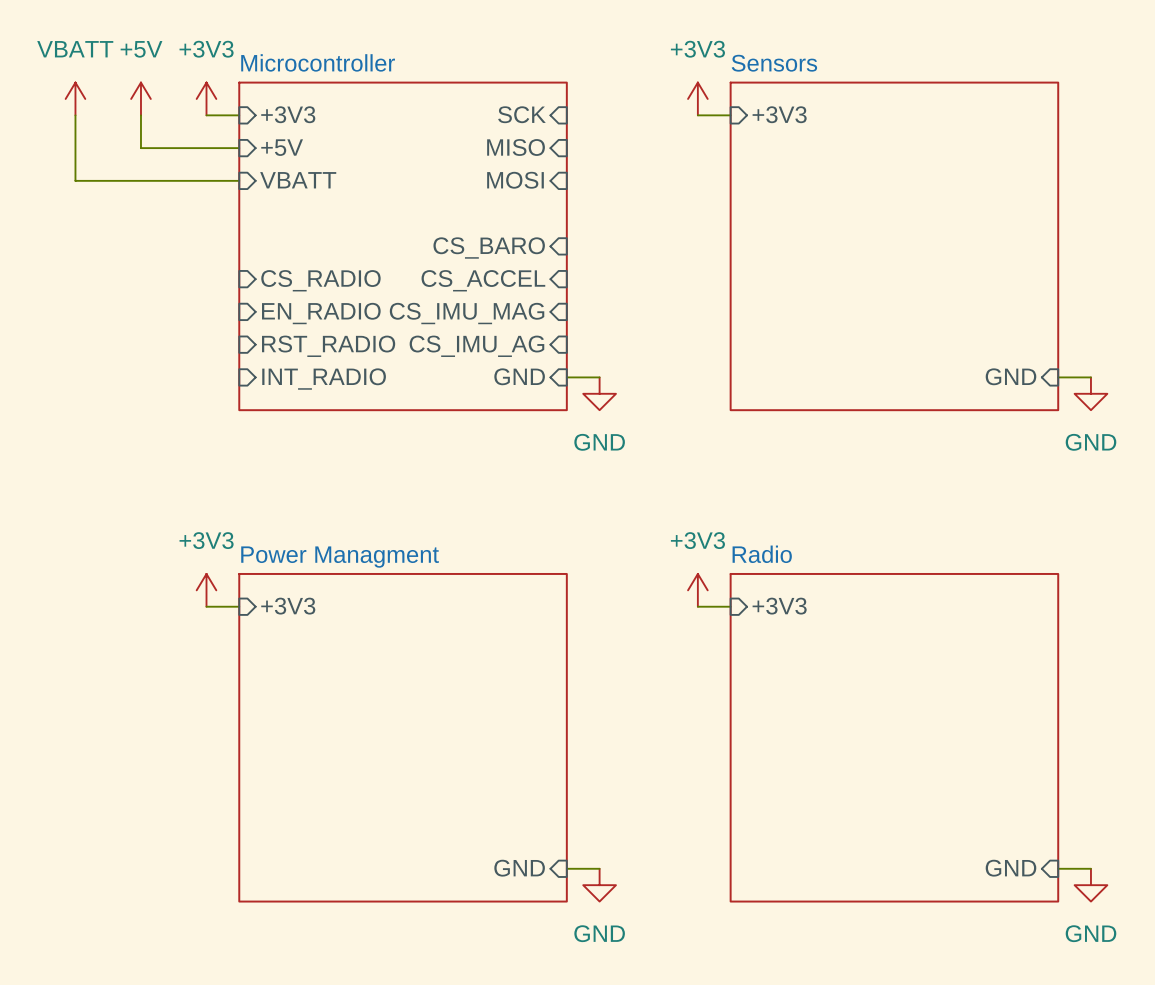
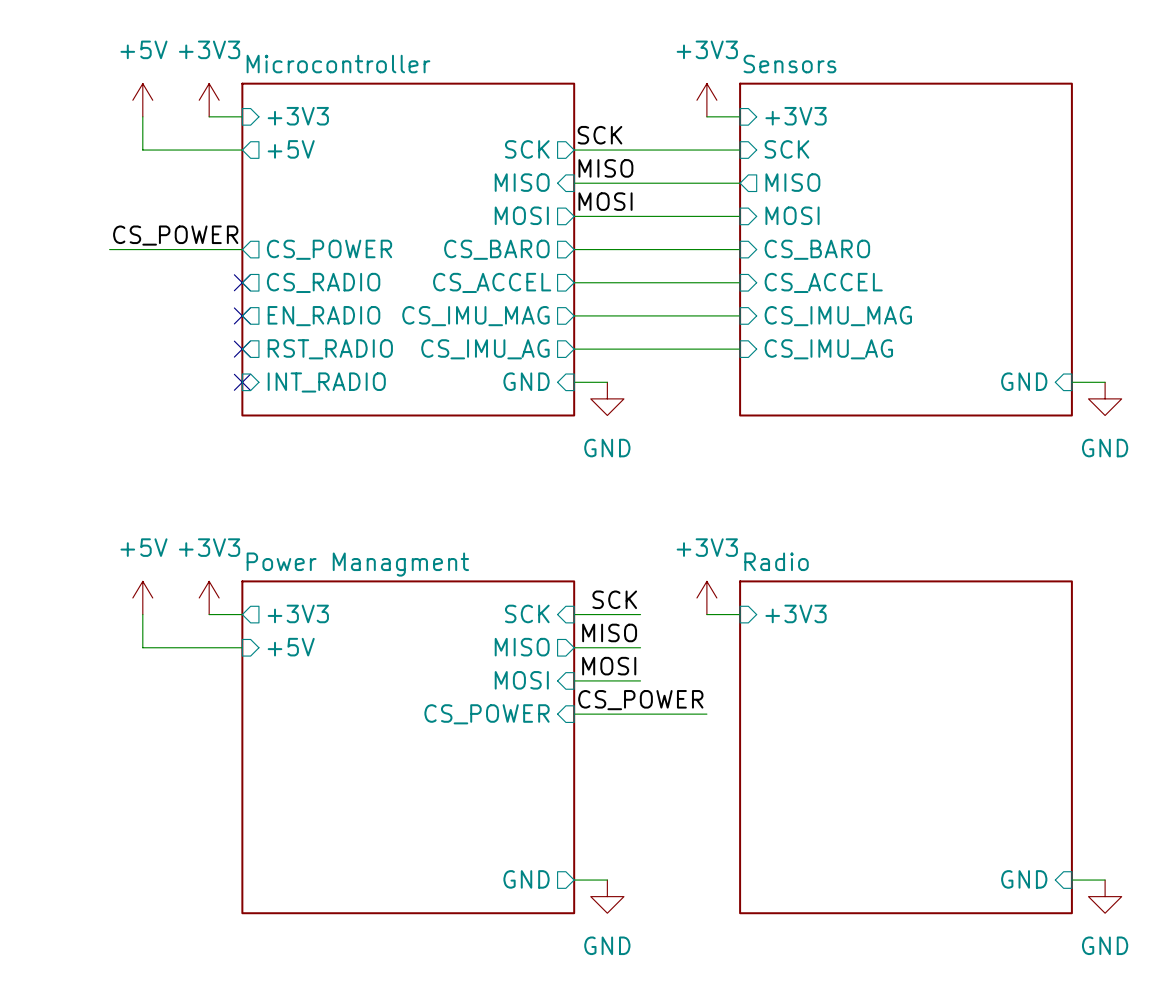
power symbol: VBATT (75, 98) -> none
sheet pin rotation: 0° (521, 114) -> 180° (786, 149)
sheet pin position: SCK (521, 114) -> SCK (786, 149)
wire: (75, 115) (75, 180) (239, 180) -> none
label: none -> SCK (599, 135)
sheet pin shape: input (282, 147) -> output (291, 149)
sheet pin shape: input (516, 147) -> output (527, 149)
sheet pin: MISO (516, 147) -> SCK (527, 149)
wire: none -> (574, 150) (740, 150)
label: none -> MISO (605, 168)
sheet pin: VBATT (298, 180) -> none
sheet pin: MOSI (515, 180) -> MISO (522, 182)
wire: none -> (574, 183) (740, 183)
sheet pin: none -> MISO (792, 182)
label: none -> MOSI (605, 201)
sheet pin: none -> MOSI (521, 215)
wire: none -> (574, 216) (740, 216)
sheet pin: none -> MOSI (792, 215)
label: none -> CS_POWER (175, 235)
wire: none -> (109, 249) (242, 249)
wire: none -> (574, 249) (740, 249)
sheet pin: none -> CS_POWER (329, 249)
sheet pin shape: input (489, 248) -> output (496, 249)
sheet pin: none -> CS_BARO (817, 249)
no-connect mark: none -> (242, 282)
wire: none -> (574, 282) (740, 282)
sheet pin shape: input (320, 280) -> output (323, 282)
sheet pin shape: input (483, 280) -> output (492, 282)
sheet pin: none -> CS_ACCEL (823, 282)
no-connect mark: none -> (242, 315)
wire: none -> (574, 315) (740, 315)
sheet pin shape: input (321, 313) -> output (323, 316)
sheet pin shape: input (467, 313) -> output (475, 316)
sheet pin: none -> CS_IMU_MAG (838, 316)
no-connect mark: none -> (242, 349)
wire: none -> (574, 349) (740, 349)
sheet pin shape: input (328, 346) -> output (330, 349)
sheet pin shape: input (476, 346) -> output (485, 349)
sheet pin: none -> CS_IMU_AG (828, 349)
no-connect mark: none -> (242, 382)
power symbol: none -> +5V (142, 597)
label: none -> SCK (614, 599)
wire: none -> (142, 614) (142, 647) (242, 647)
sheet pin shape: input (288, 606) -> output (298, 613)
sheet pin: none -> SCK (527, 613)
wire: none -> (574, 614) (640, 614)
label: none -> MISO (609, 632)
sheet pin: none -> +5V (291, 647)
sheet pin: none -> MISO (522, 647)
wire: none -> (574, 647) (640, 647)
label: none -> MOSI (609, 666)
sheet pin: none -> MOSI (521, 680)
wire: none -> (574, 680) (640, 680)
label: none -> CS_POWER (640, 700)
wire: none -> (574, 714) (706, 714)
sheet pin: none -> CS_POWER (487, 714)
sheet pin shape: input (519, 868) -> output (526, 879)

